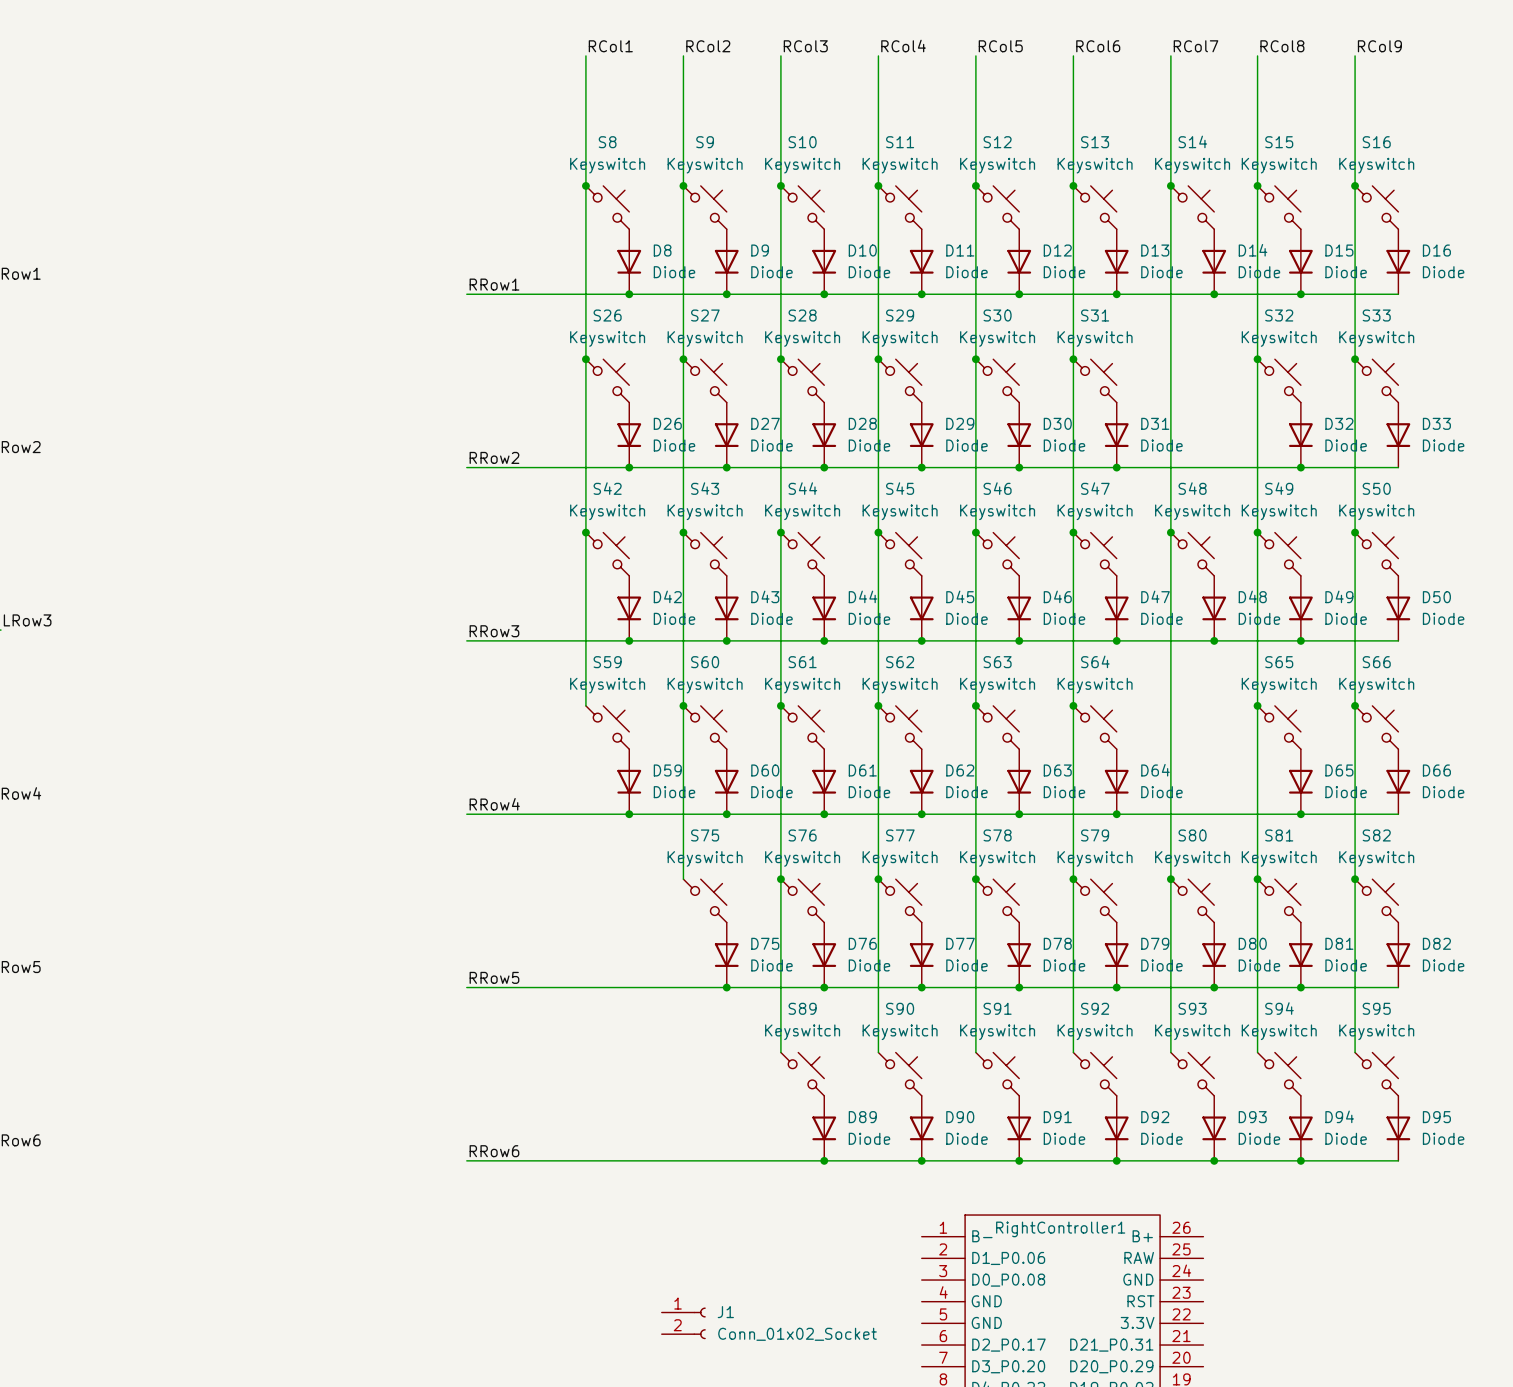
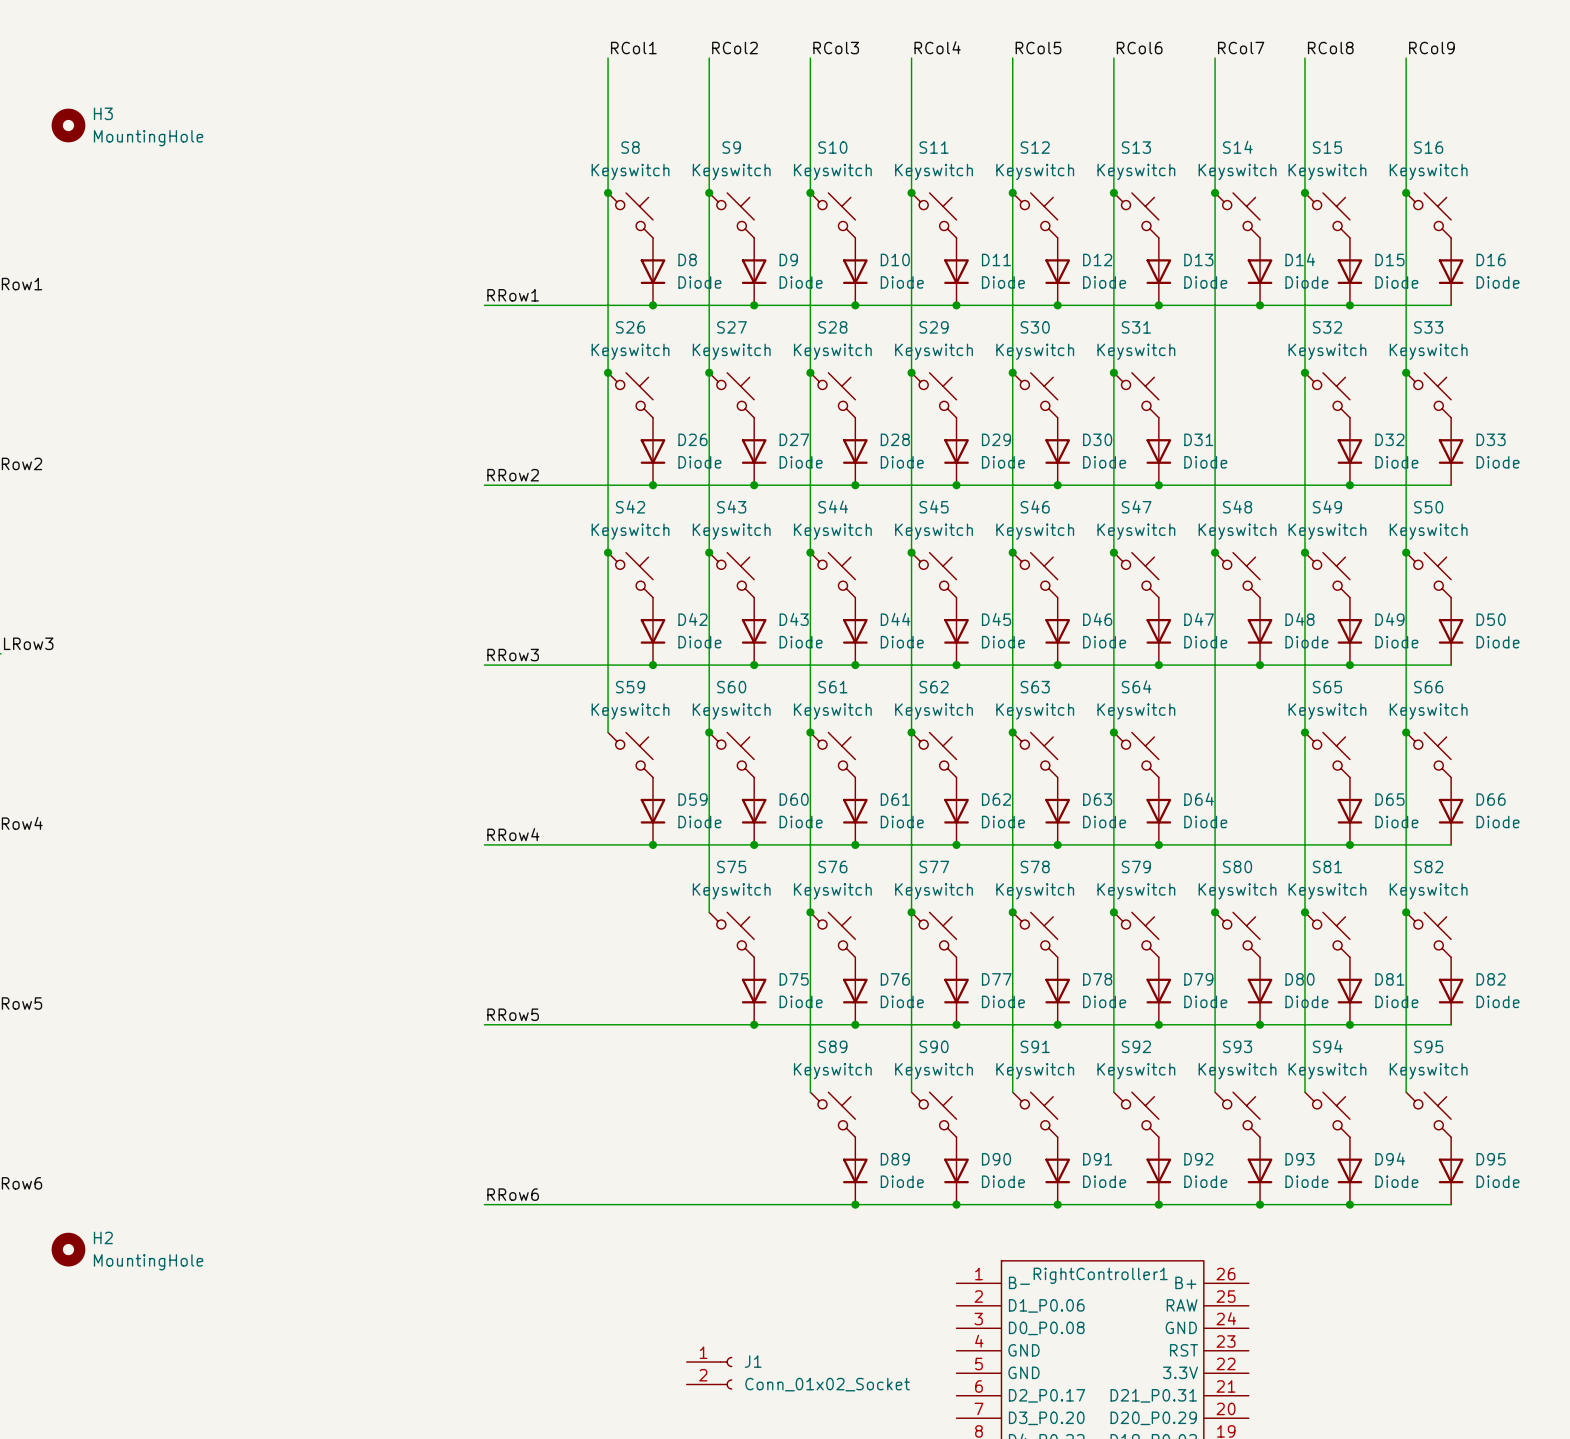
H3: none -> MountingHole (68, 125)
H2: none -> MountingHole (68, 1249)

